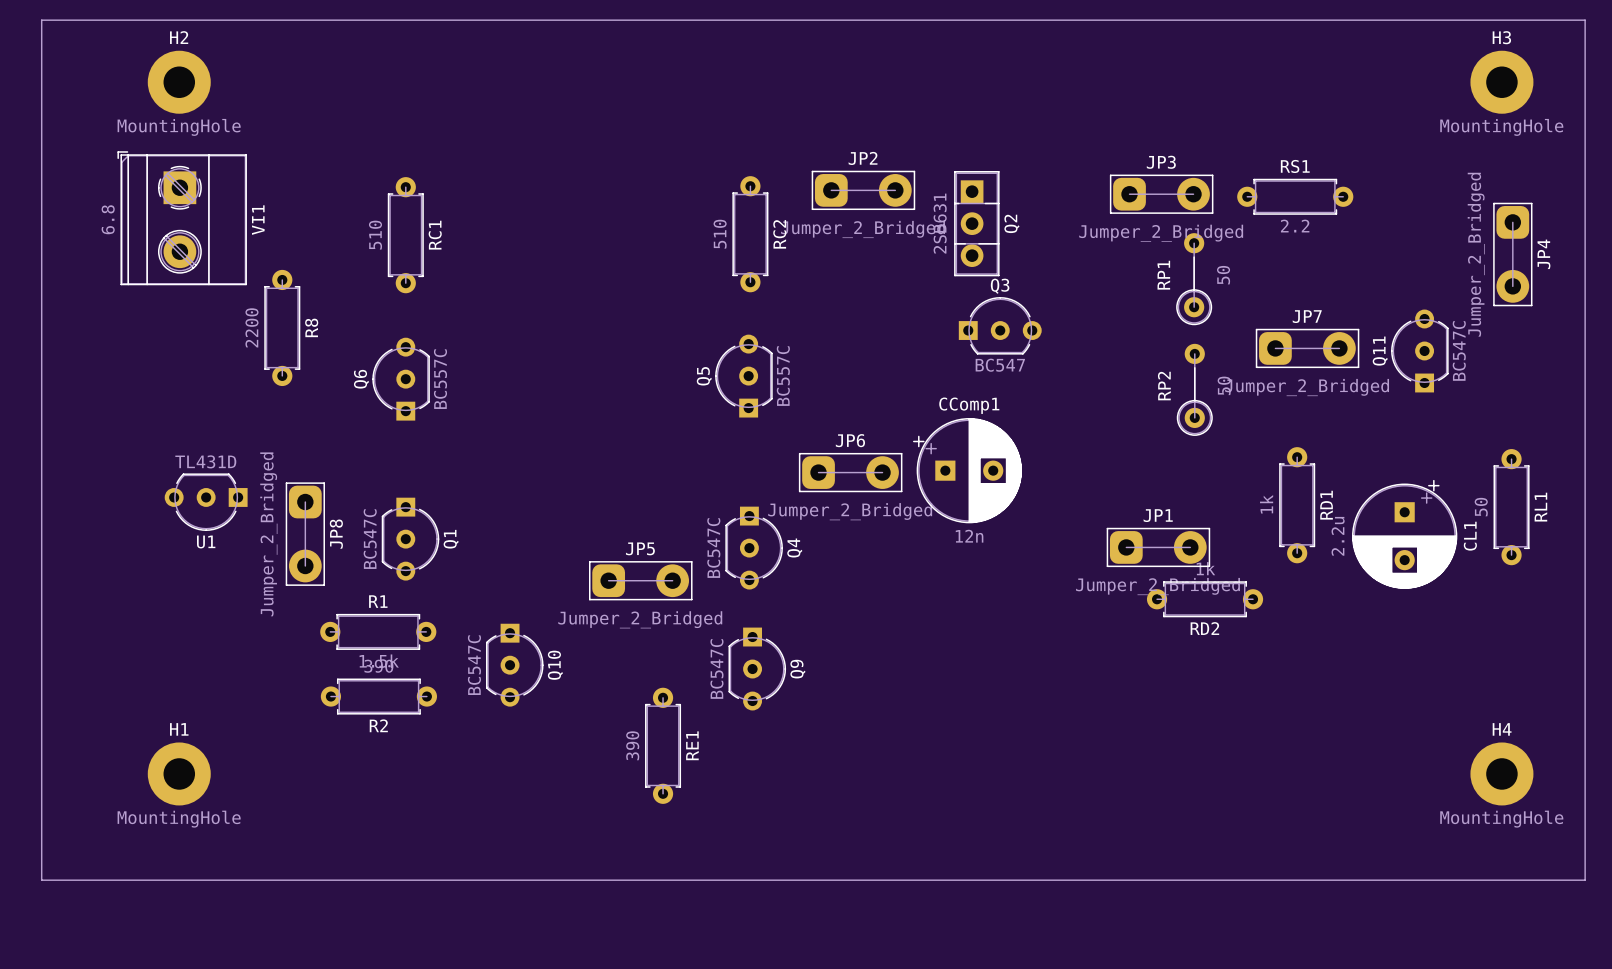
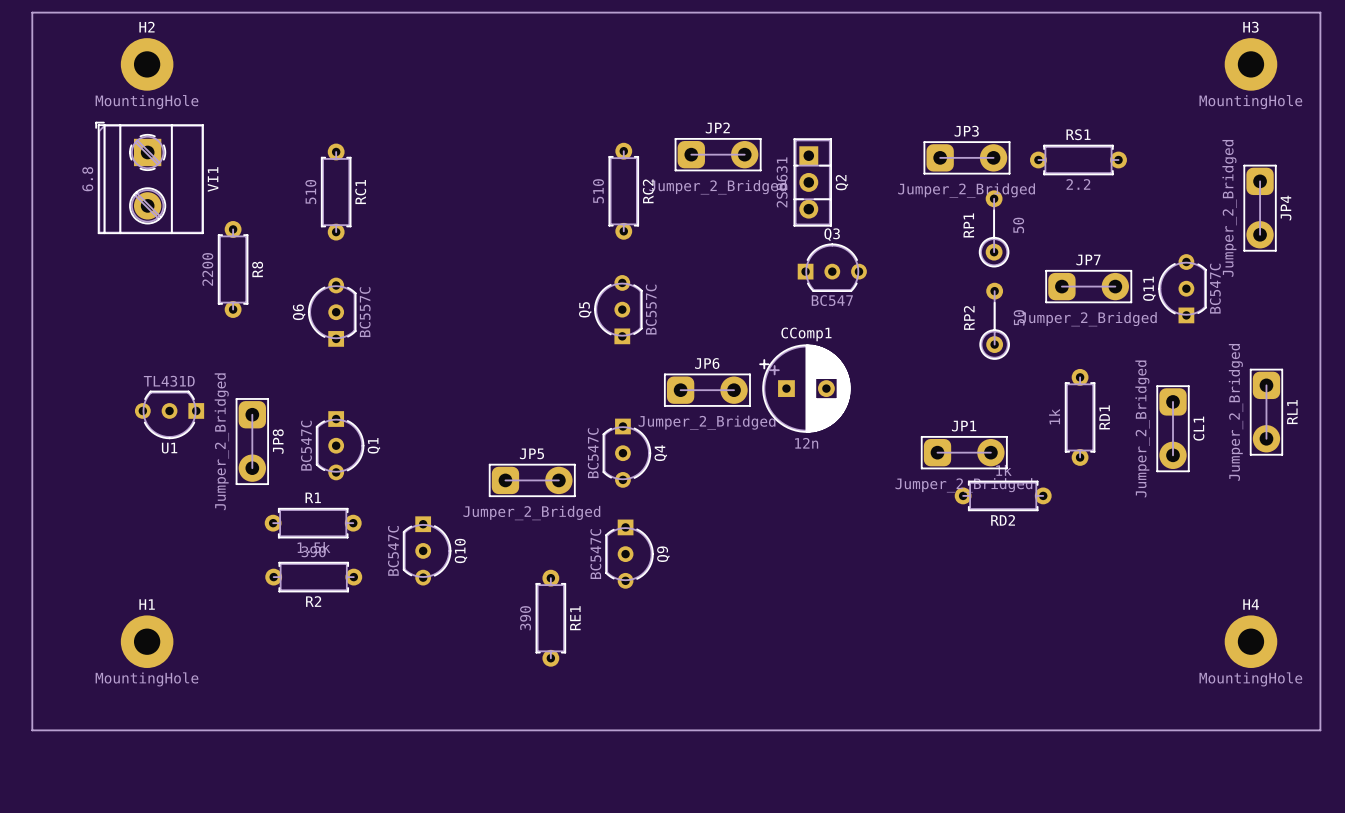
RL1 footprint: [1493, 449, 1530, 566] -> [1250, 368, 1283, 456]
CL1 footprint: [1352, 479, 1458, 589] -> [1156, 385, 1190, 472]
RL1 value: 50 (1481, 507) -> Jumper_2_Bridged (1236, 412)
CL1 value: 2.2u (1338, 536) -> Jumper_2_Bridged (1142, 428)
CL1 name position: CL1 (1470, 536) -> CL1 (1198, 428)

